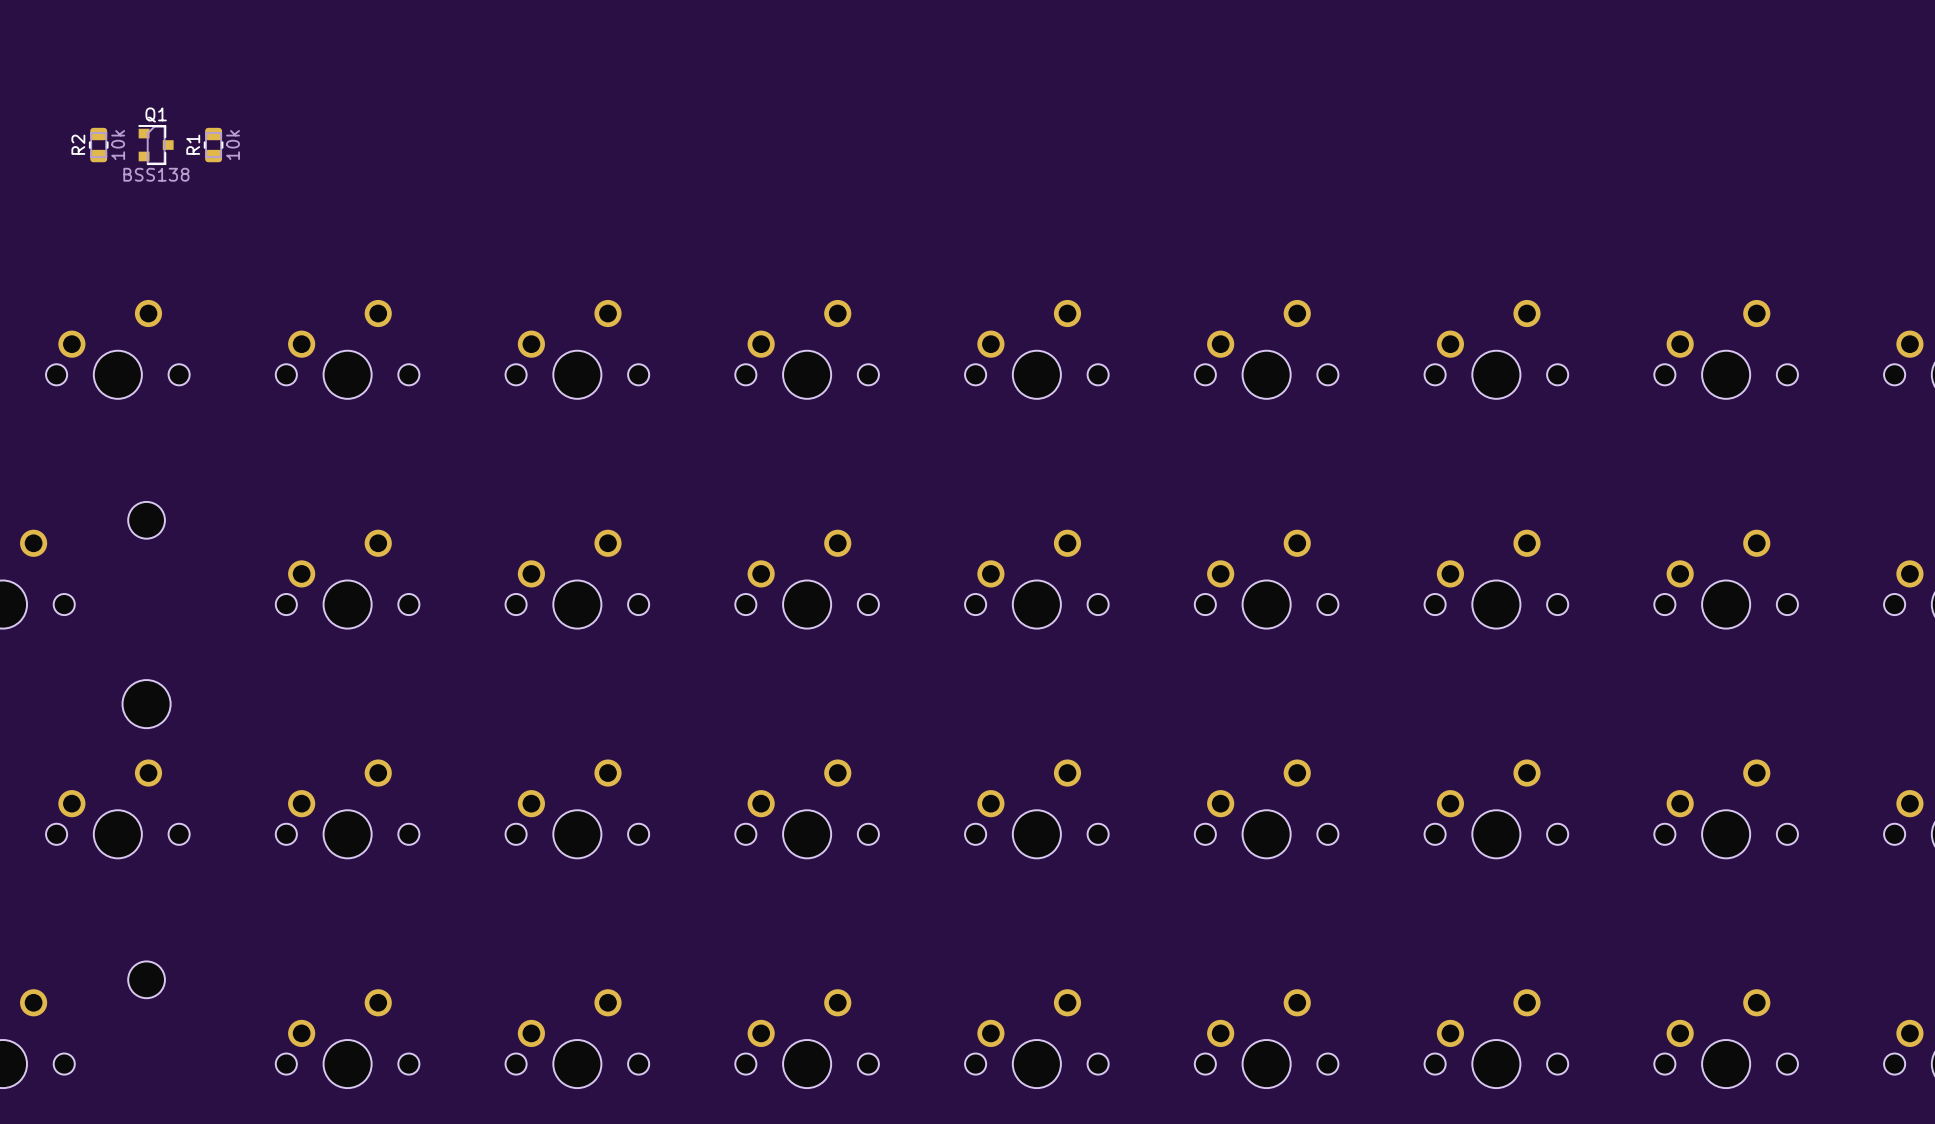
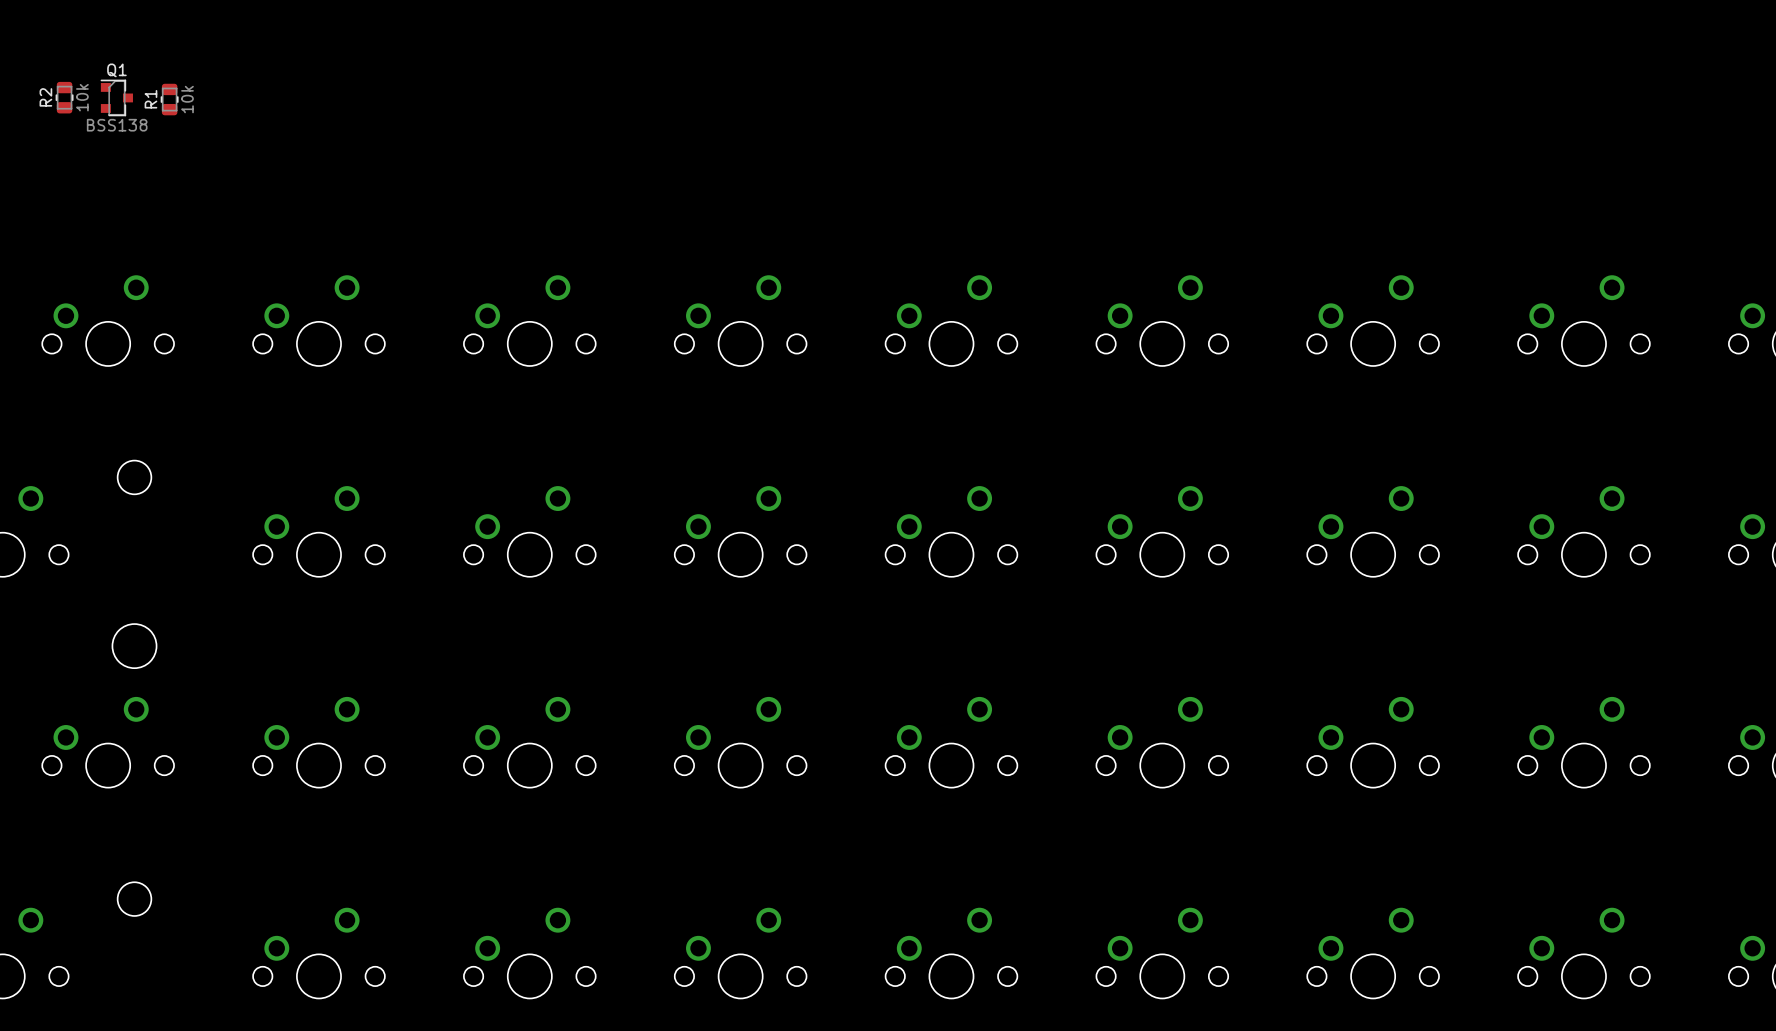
R2 position: (98, 145) -> (64, 97)
Q1 position: (156, 145) -> (116, 97)
R1 position: (213, 145) -> (169, 99)

